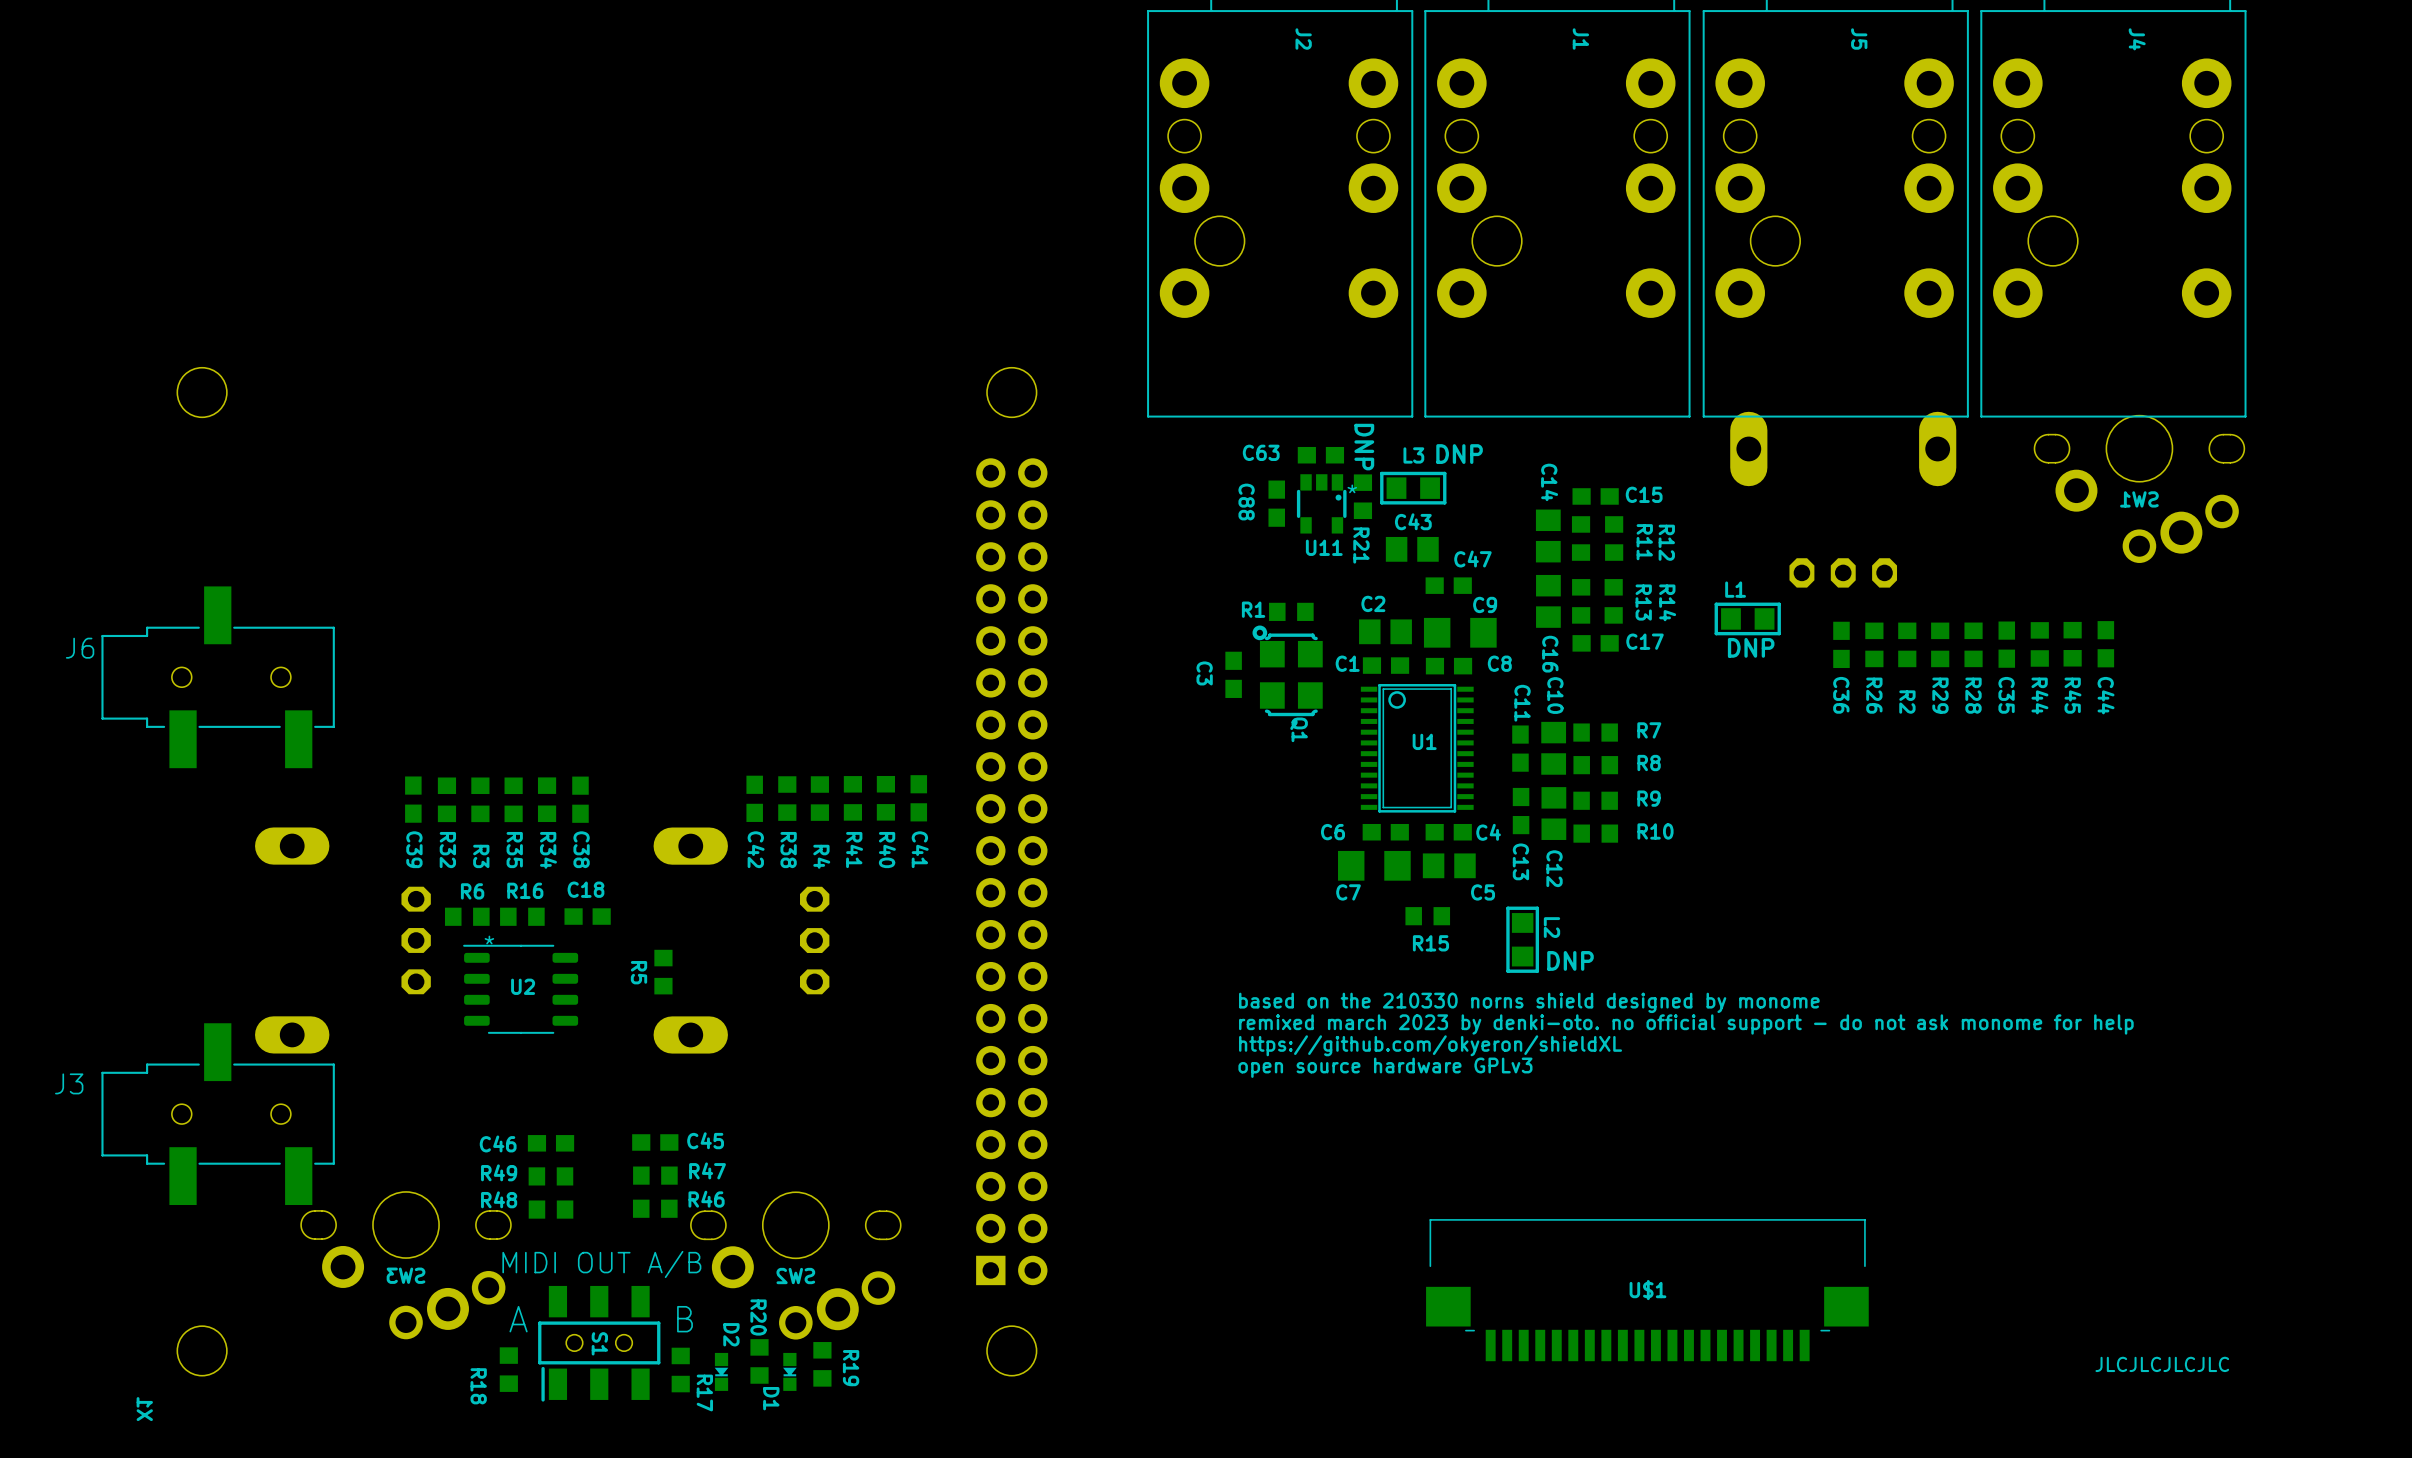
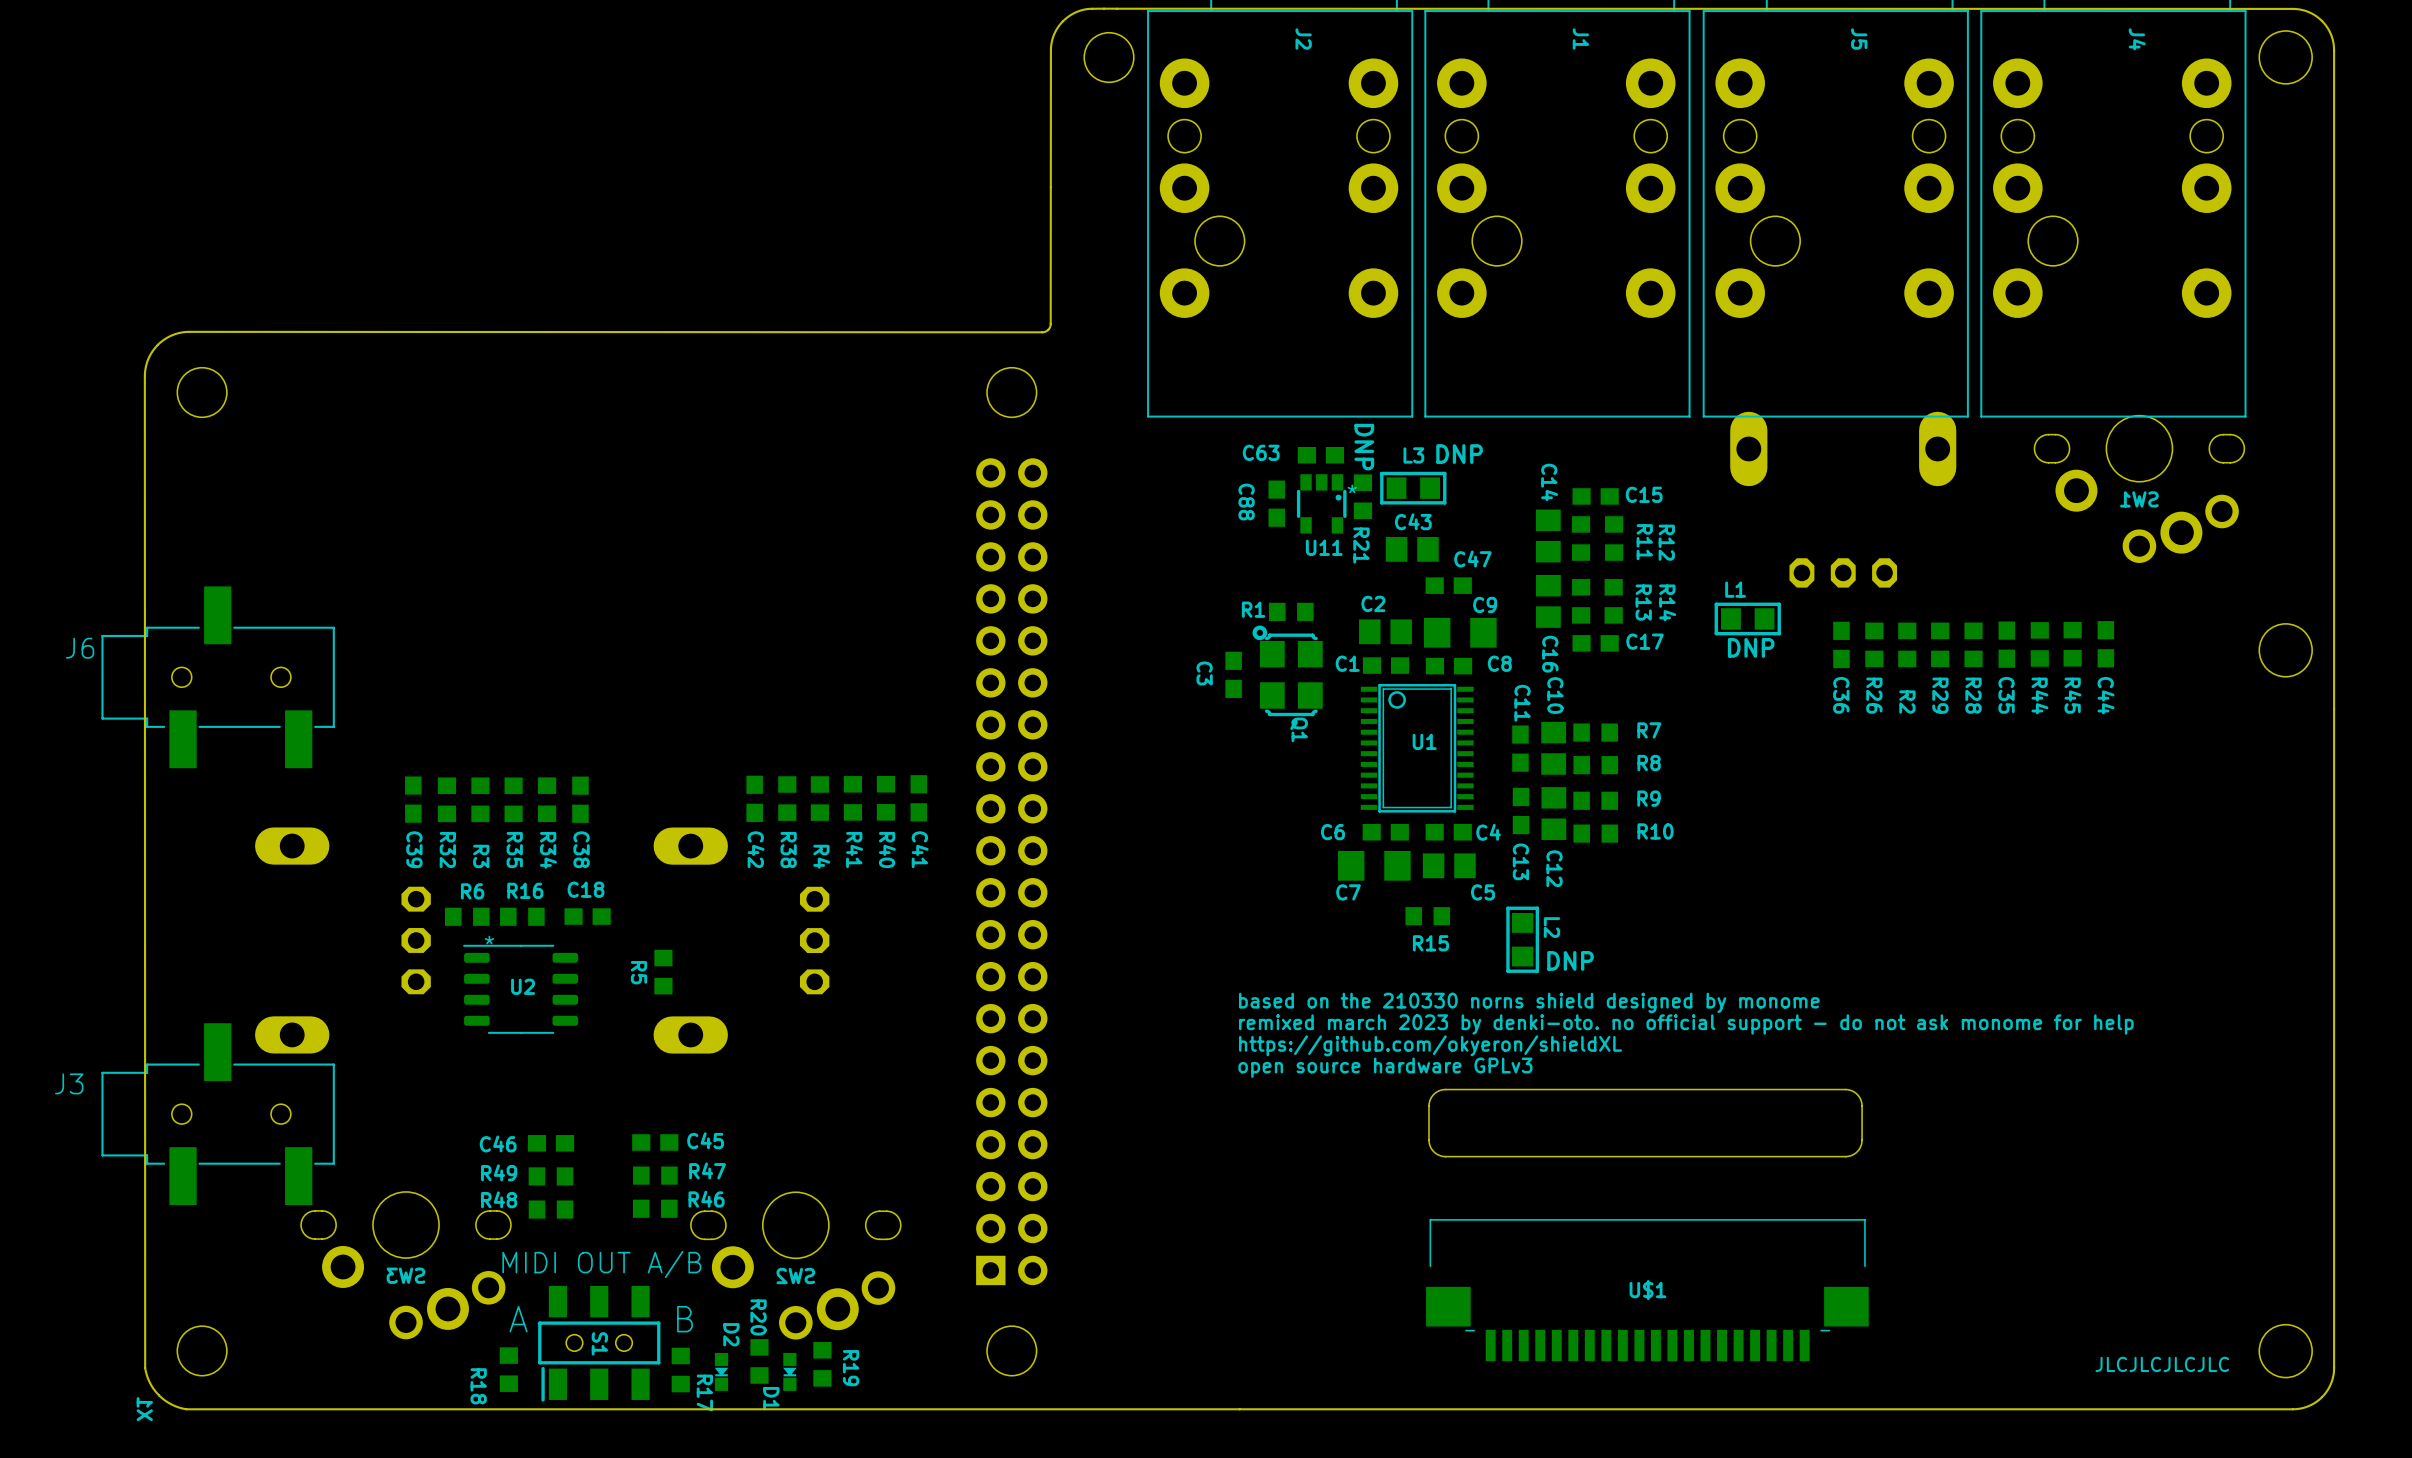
board edge: none -> (1116, 8) (1088, 9) (1074, 13) (1059, 25) (1051, 42) (1050, 323) (1049, 328) (1045, 331) (189, 331) (168, 337) (152, 351) (146, 363) (144, 376) (145, 1367) (149, 1381) (156, 1392) (169, 1403) (186, 1409) (2292, 1409) (2307, 1406) (2319, 1399) (2330, 1385) (2334, 1367) (2334, 50) (2331, 35) (2324, 23) (2310, 12) (2292, 8) (1116, 8)
round board edge: none -> [2258, 30, 2313, 85]
round board edge: none -> [1083, 32, 1135, 83]
round board edge: none -> [2258, 623, 2313, 678]
board edge: none -> (1845, 1089) (1443, 1089) (1433, 1094) (1429, 1102) (1429, 1142) (1433, 1151) (1445, 1156) (1847, 1156) (1855, 1153) (1861, 1144) (1862, 1106) (1857, 1094) (1845, 1089)
round board edge: none -> [2258, 1324, 2313, 1378]

